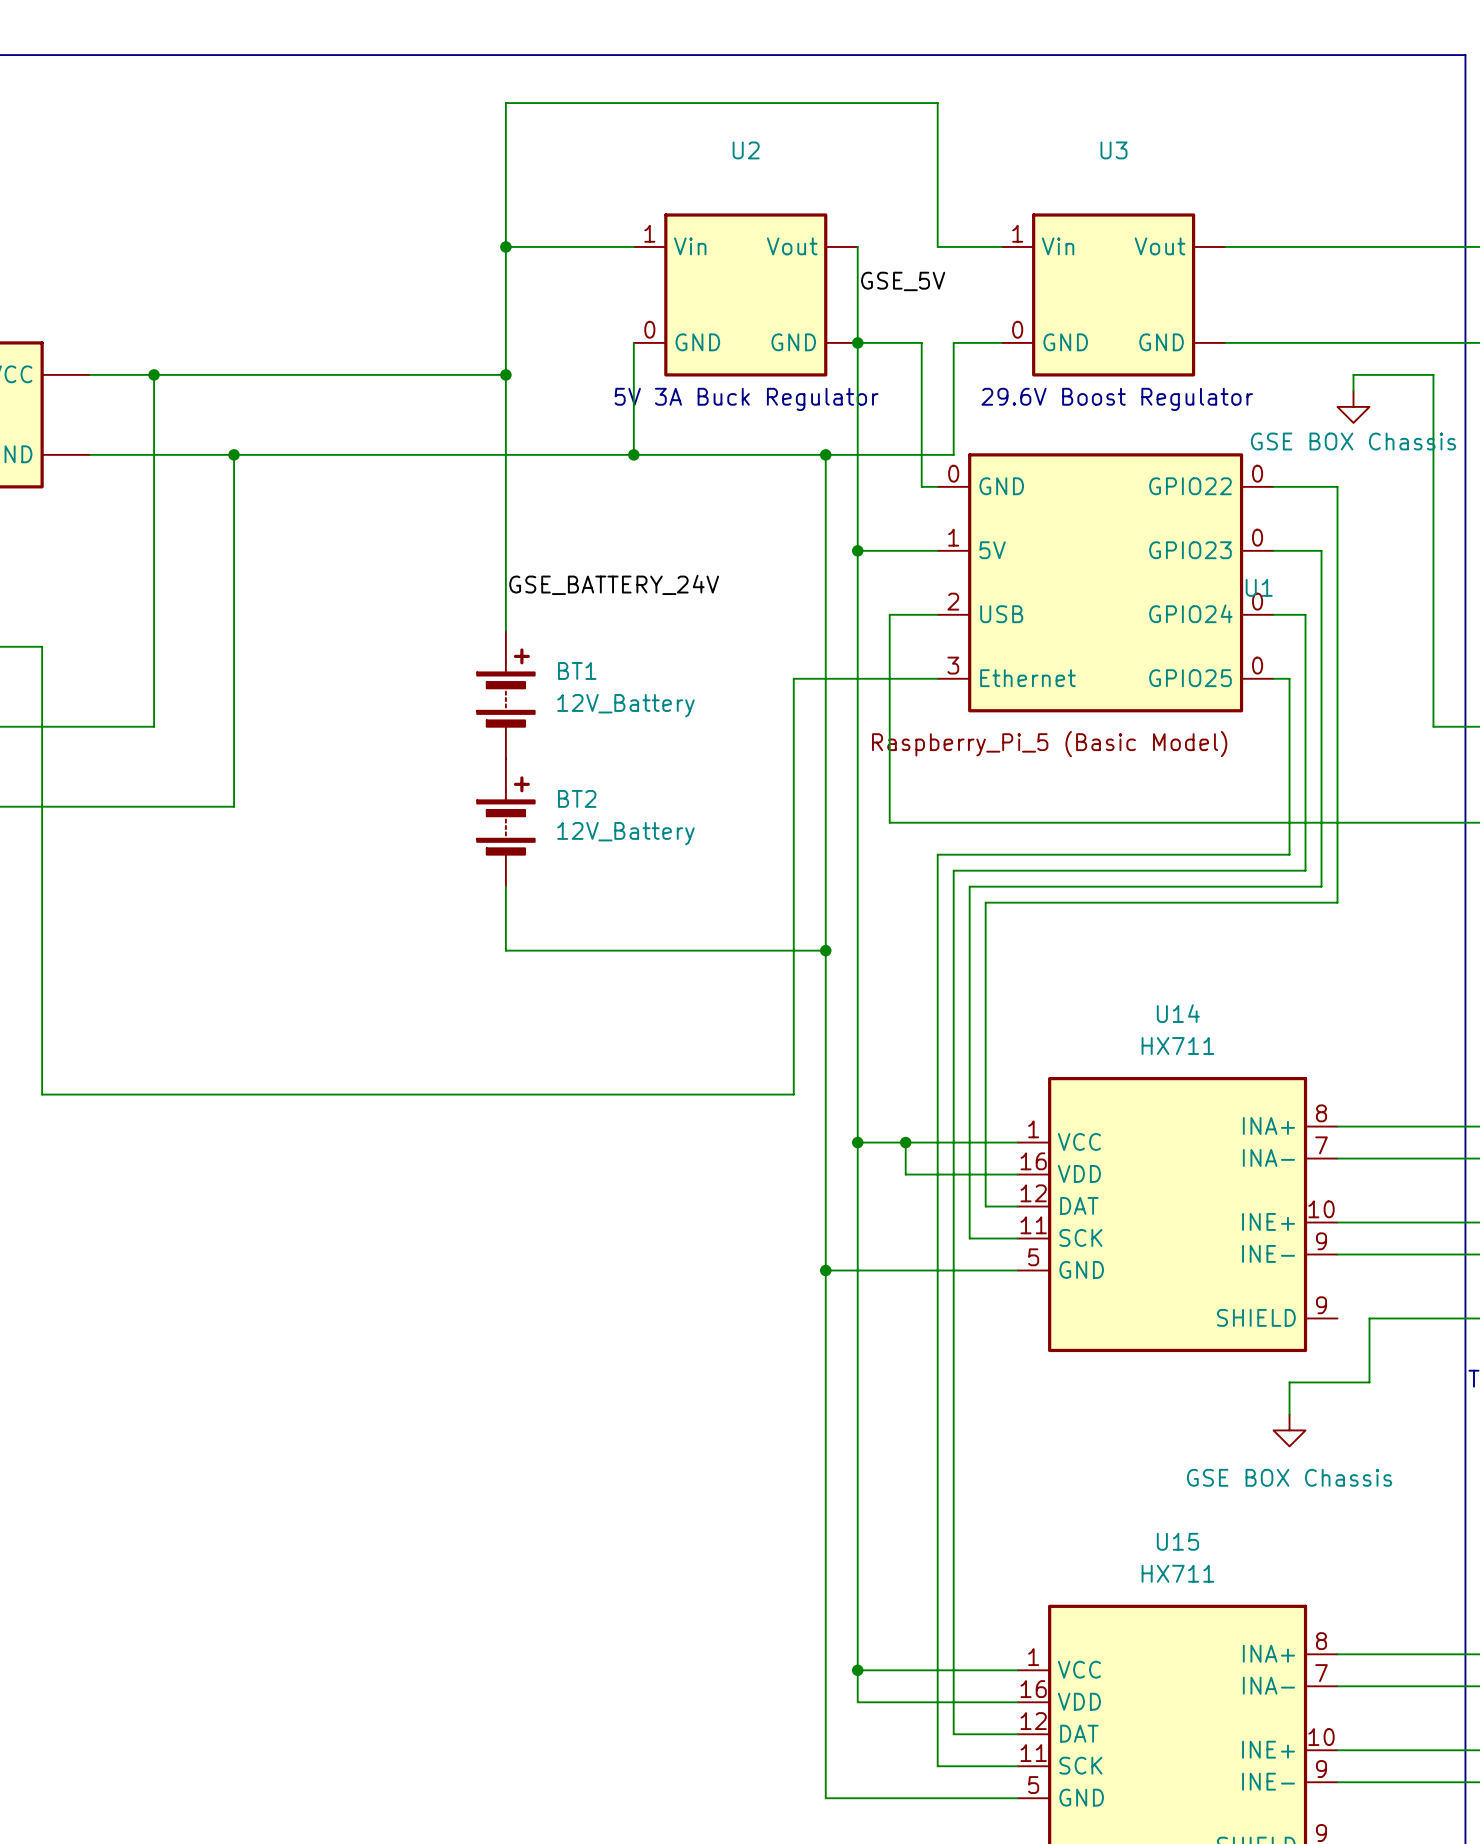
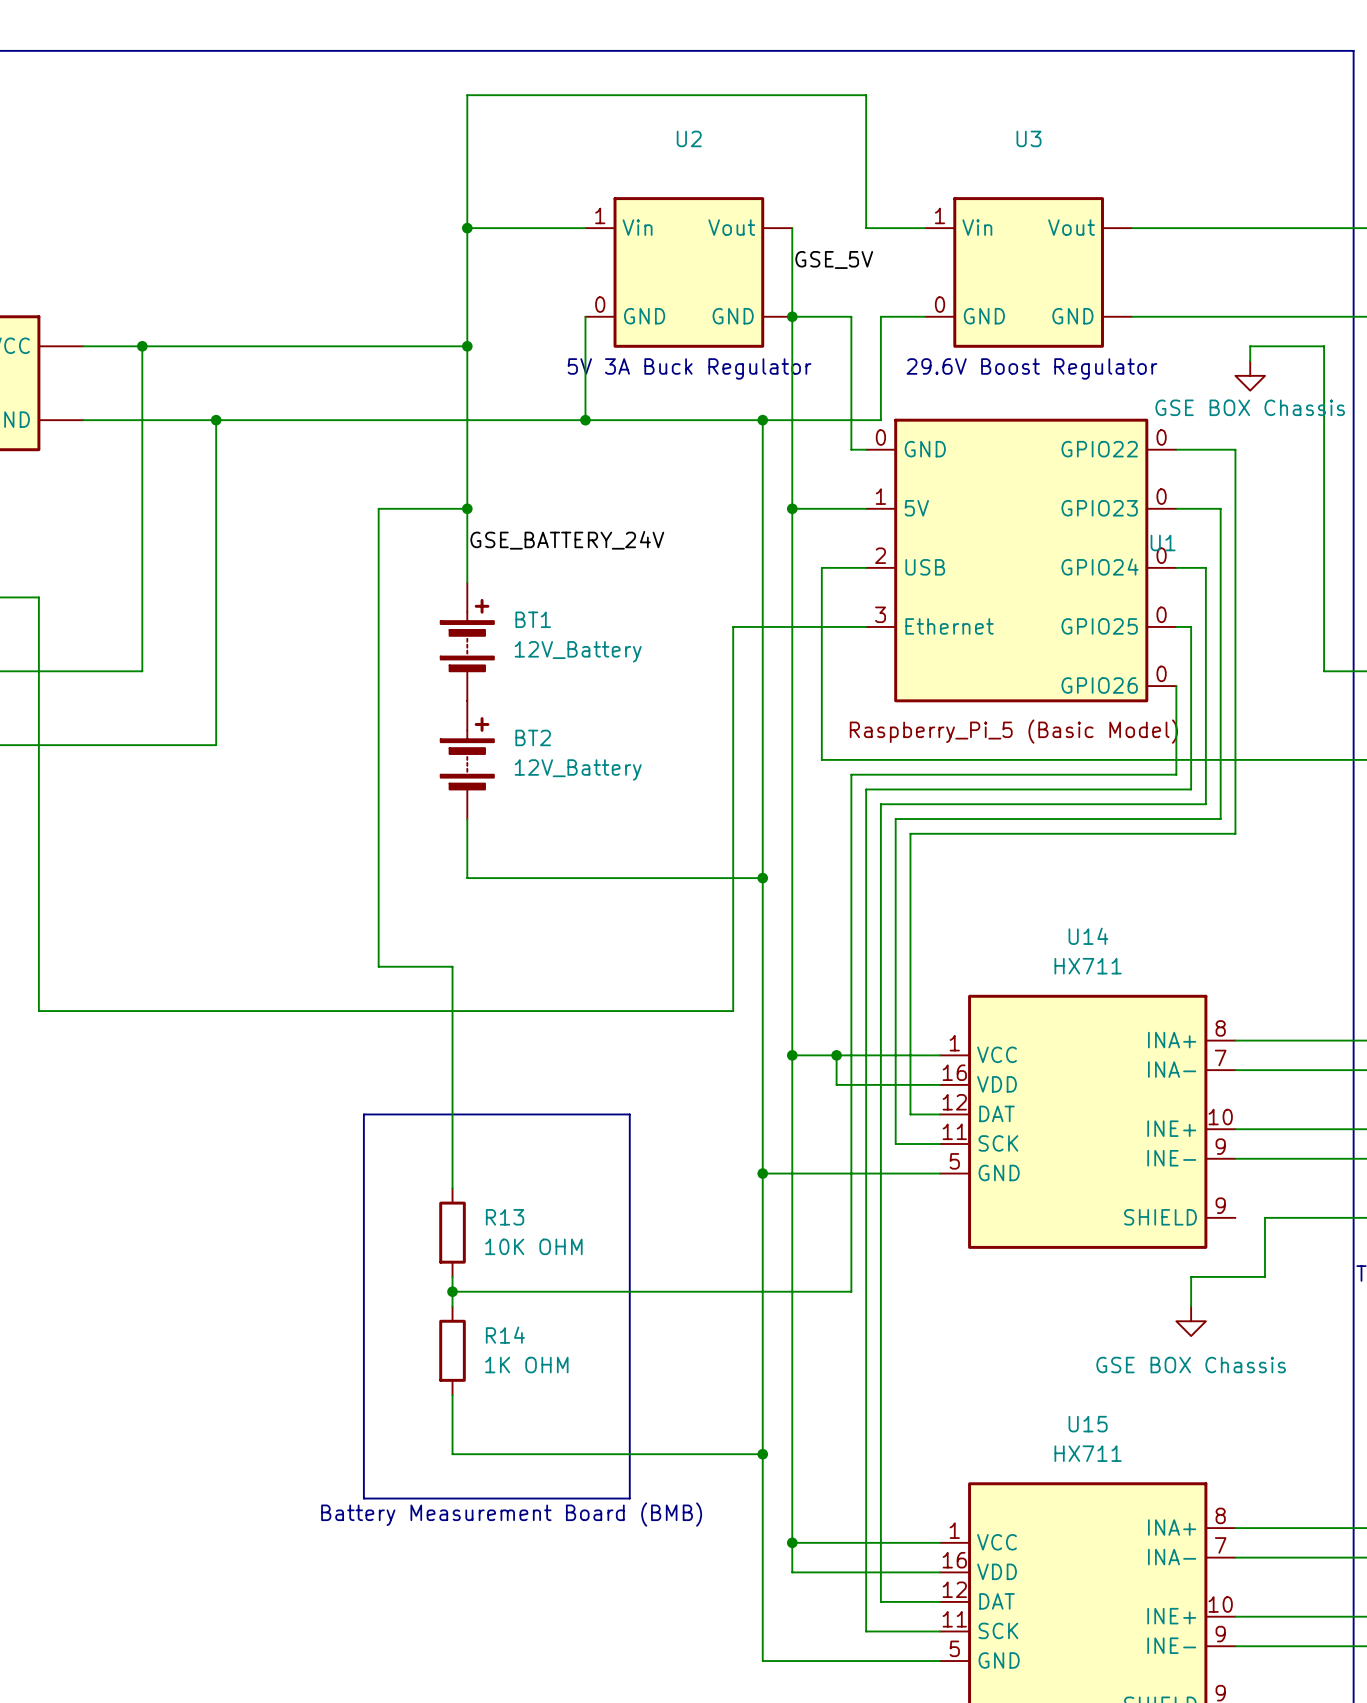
U1 symbol: [937, 453, 1274, 713] -> [866, 418, 1177, 703]
wire: none -> (467, 508) (378, 508) (378, 966) (452, 966) (452, 1188)
junction: none -> (467, 508)
wire: none -> (1176, 686) (1176, 774) (851, 774) (851, 1291) (452, 1291)
line: none -> (363, 1114) (629, 1114) (629, 1498) (363, 1498) (363, 1114)
R13: none -> 10K OHM (452, 1232)
wire: none -> (452, 1276) (452, 1306)
junction: none -> (452, 1291)
R14: none -> 1K OHM (452, 1350)
wire: none -> (452, 1395) (452, 1454) (762, 1454)
junction: none -> (762, 1454)
text: none -> Battery Measurement Board (BMB) (511, 1514)

